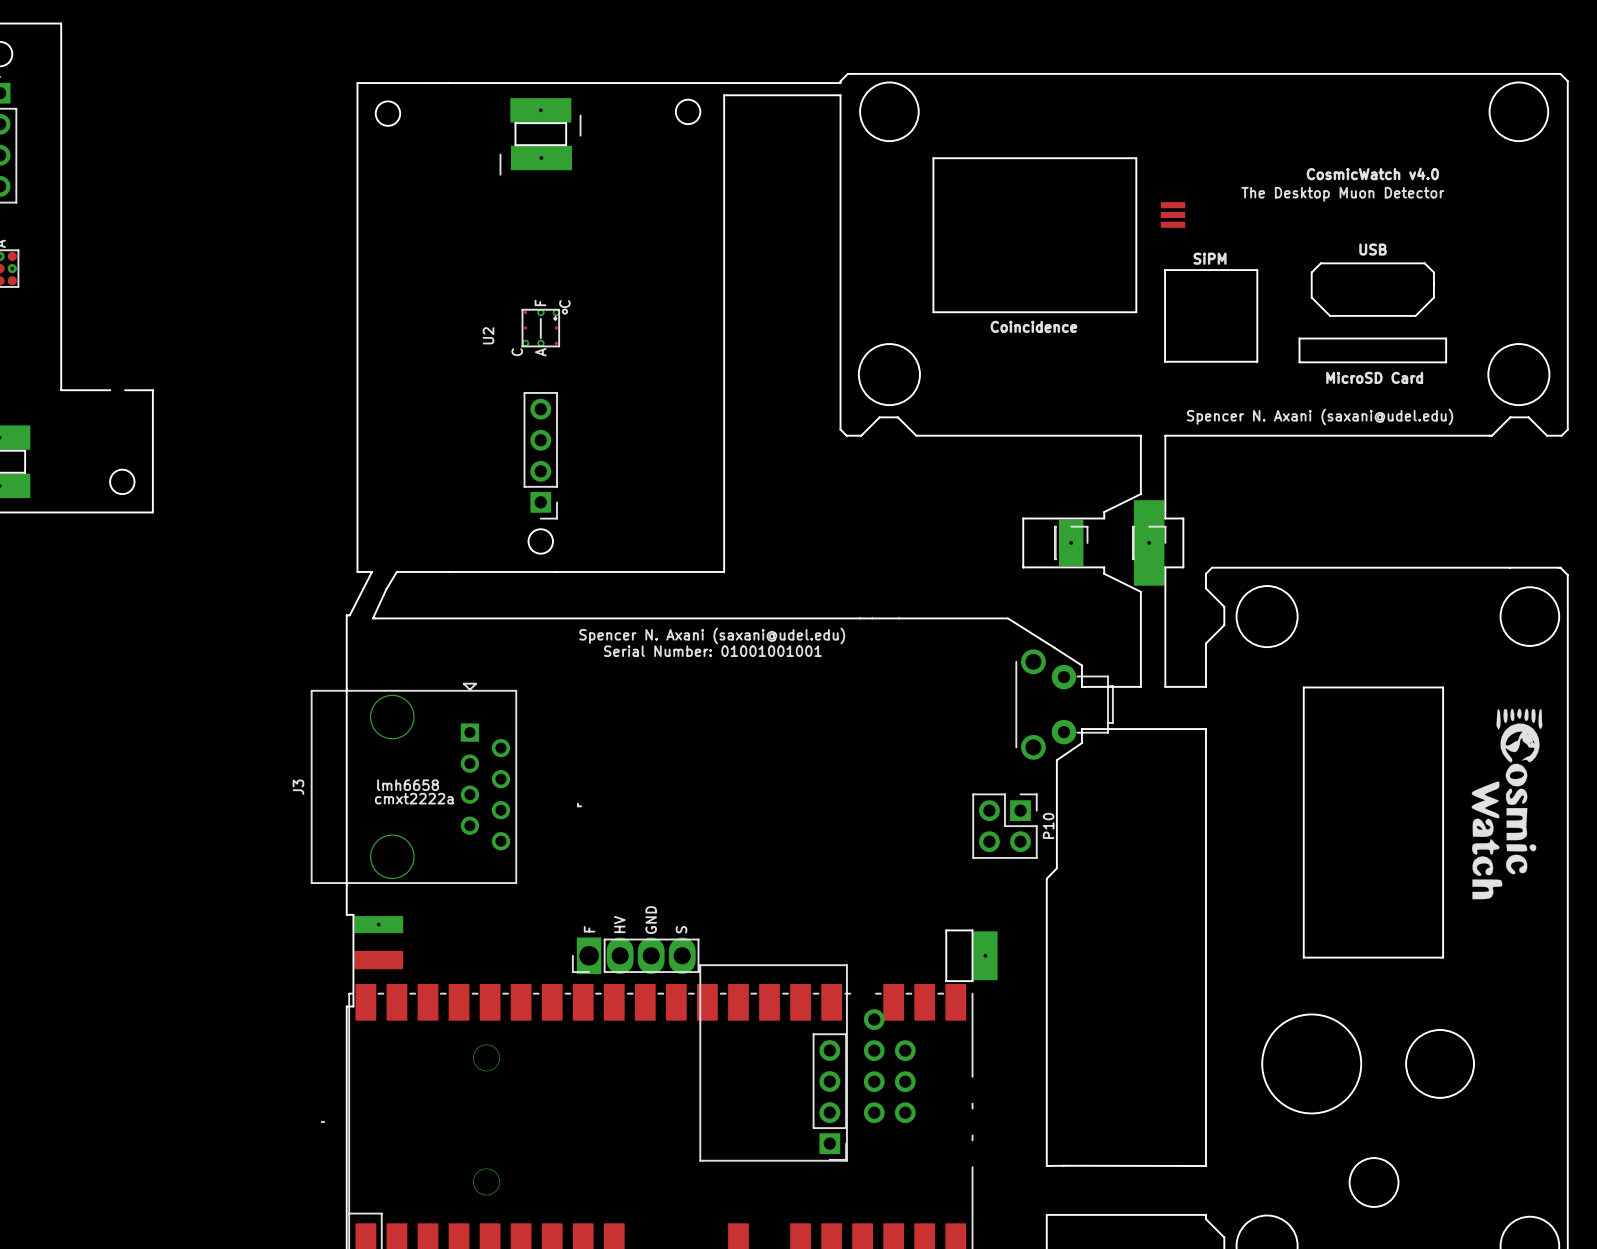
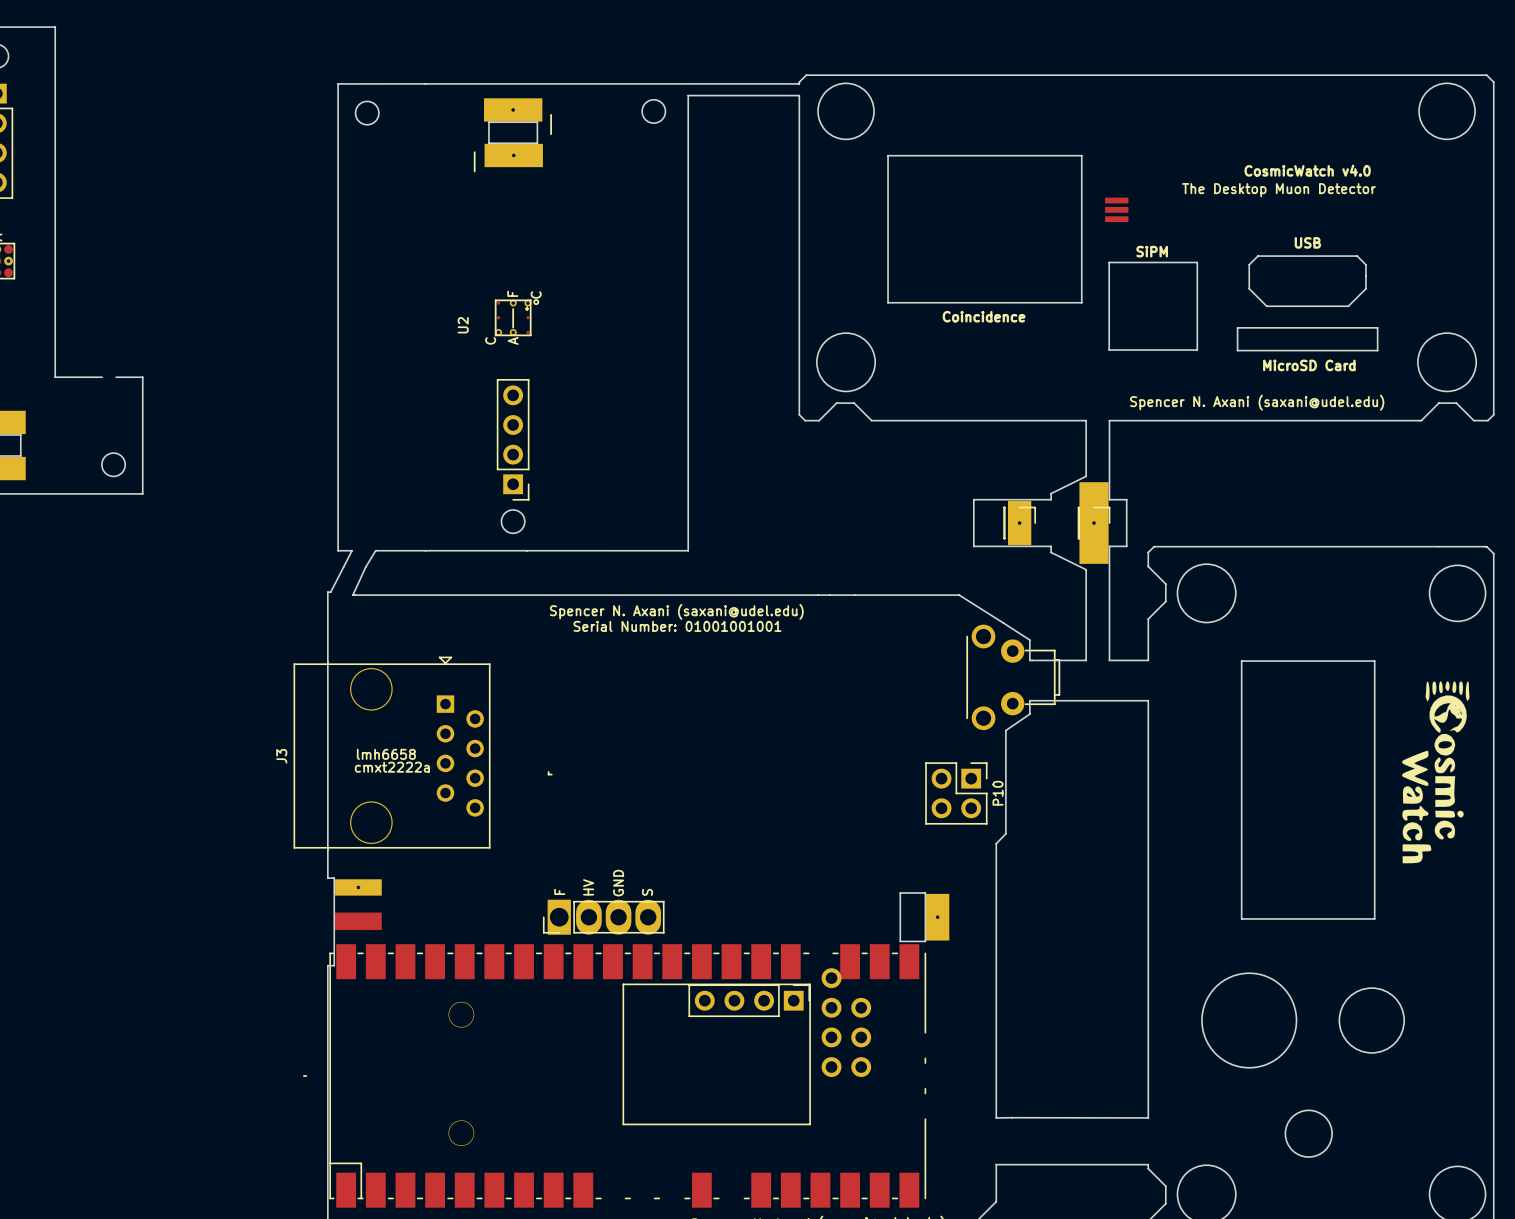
part rotation: 0° (773, 1062) -> 90° counterclockwise (716, 1054)

